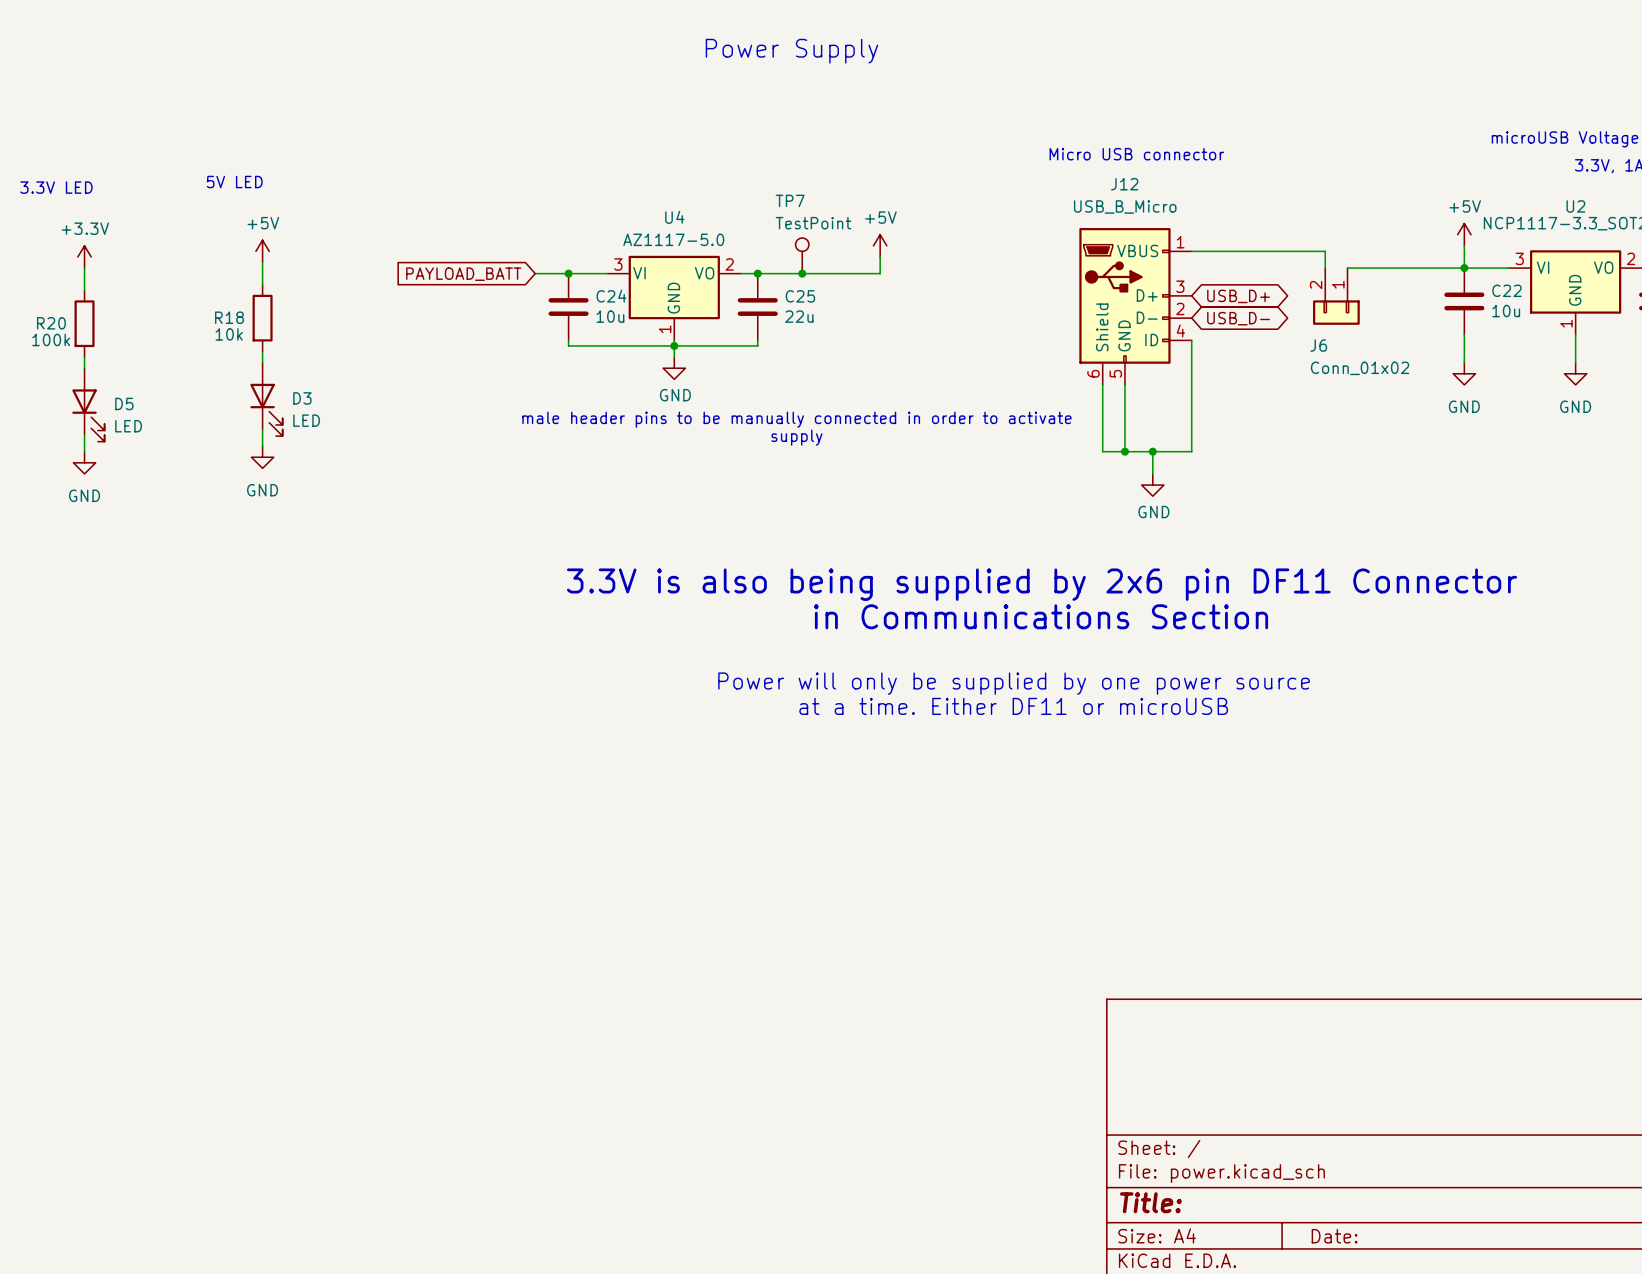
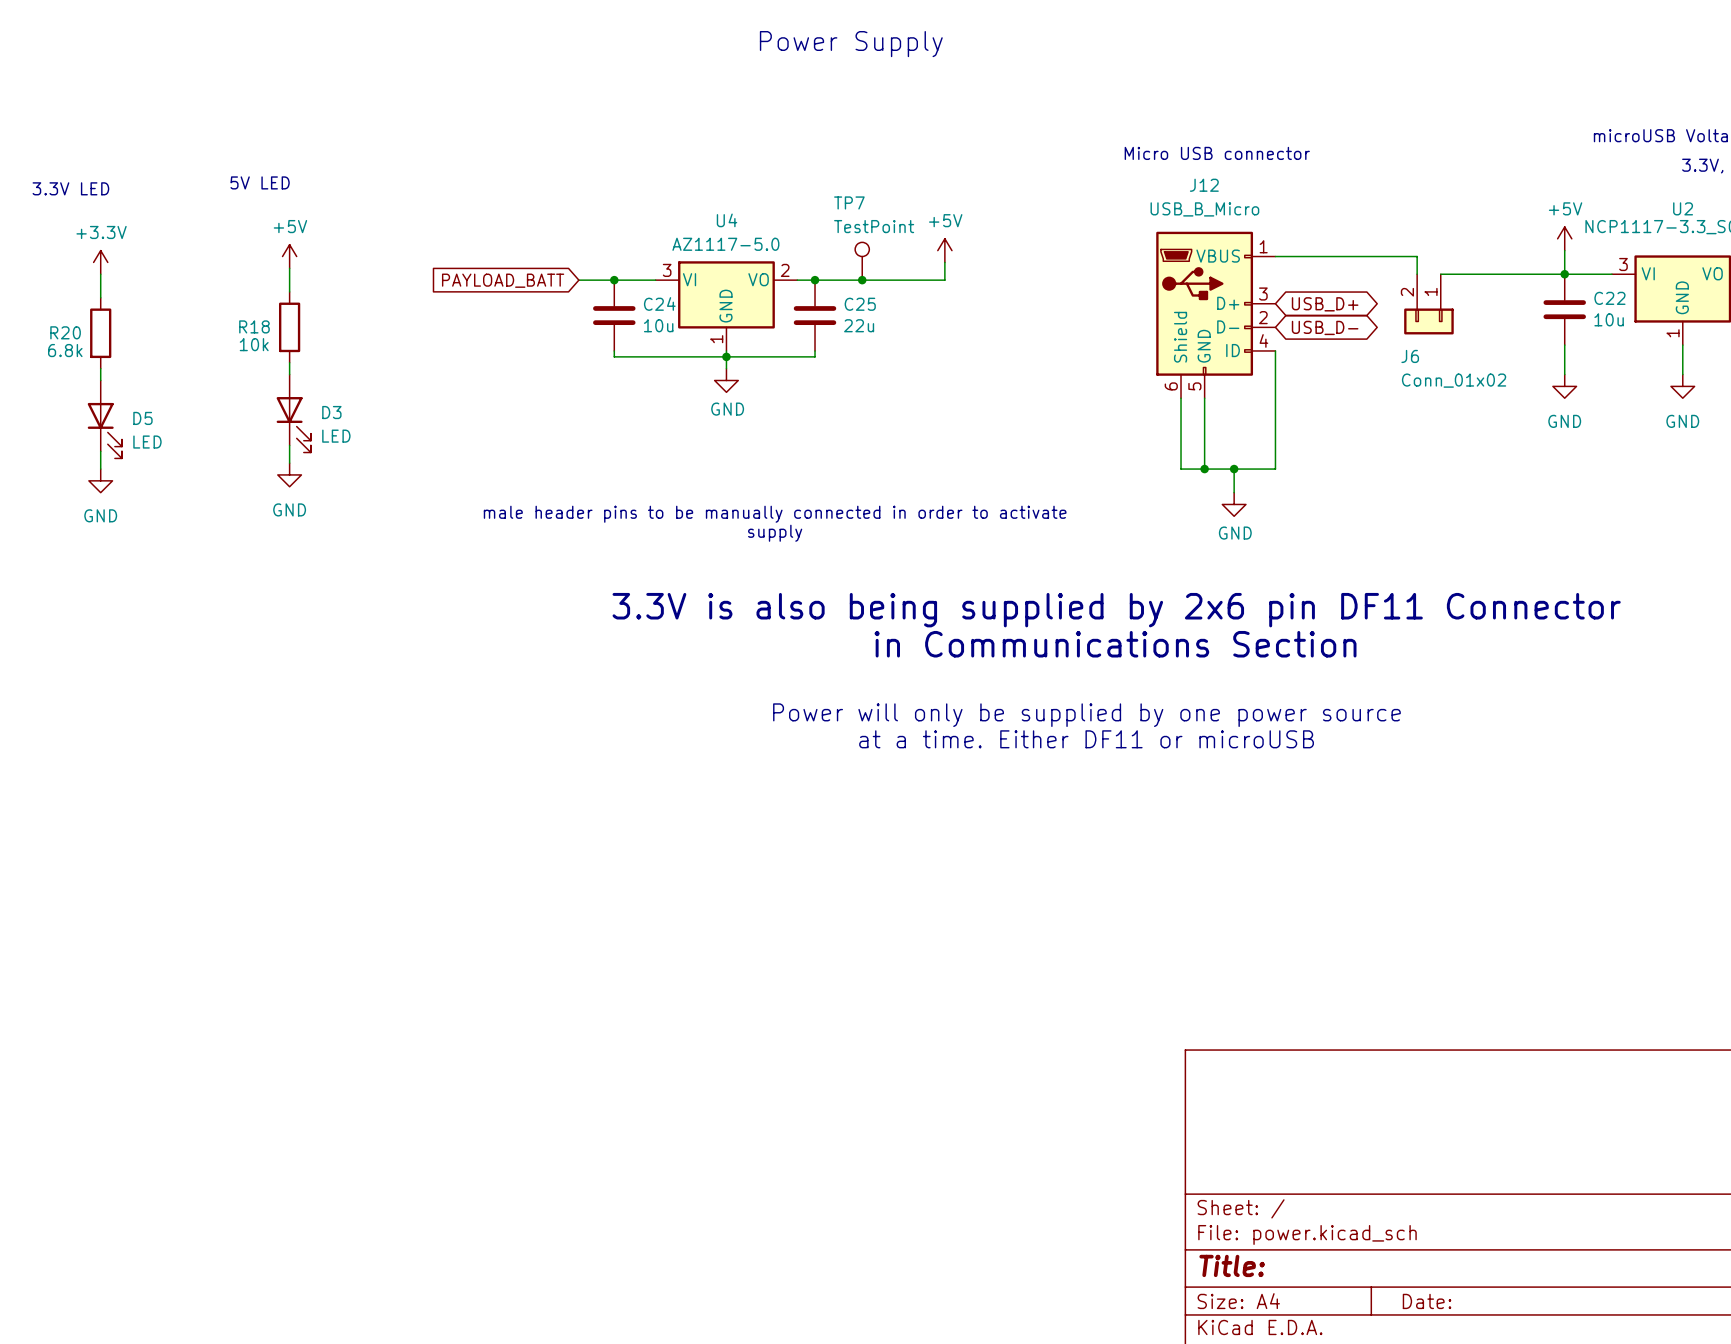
R20 value: 100k (51, 339) -> 6.8k (65, 350)
text position: male header pins to be manually connected in order to activate (796, 419) -> male header pins to be manually connected in order to activate (775, 514)
text position: supply (796, 437) -> supply (775, 533)

